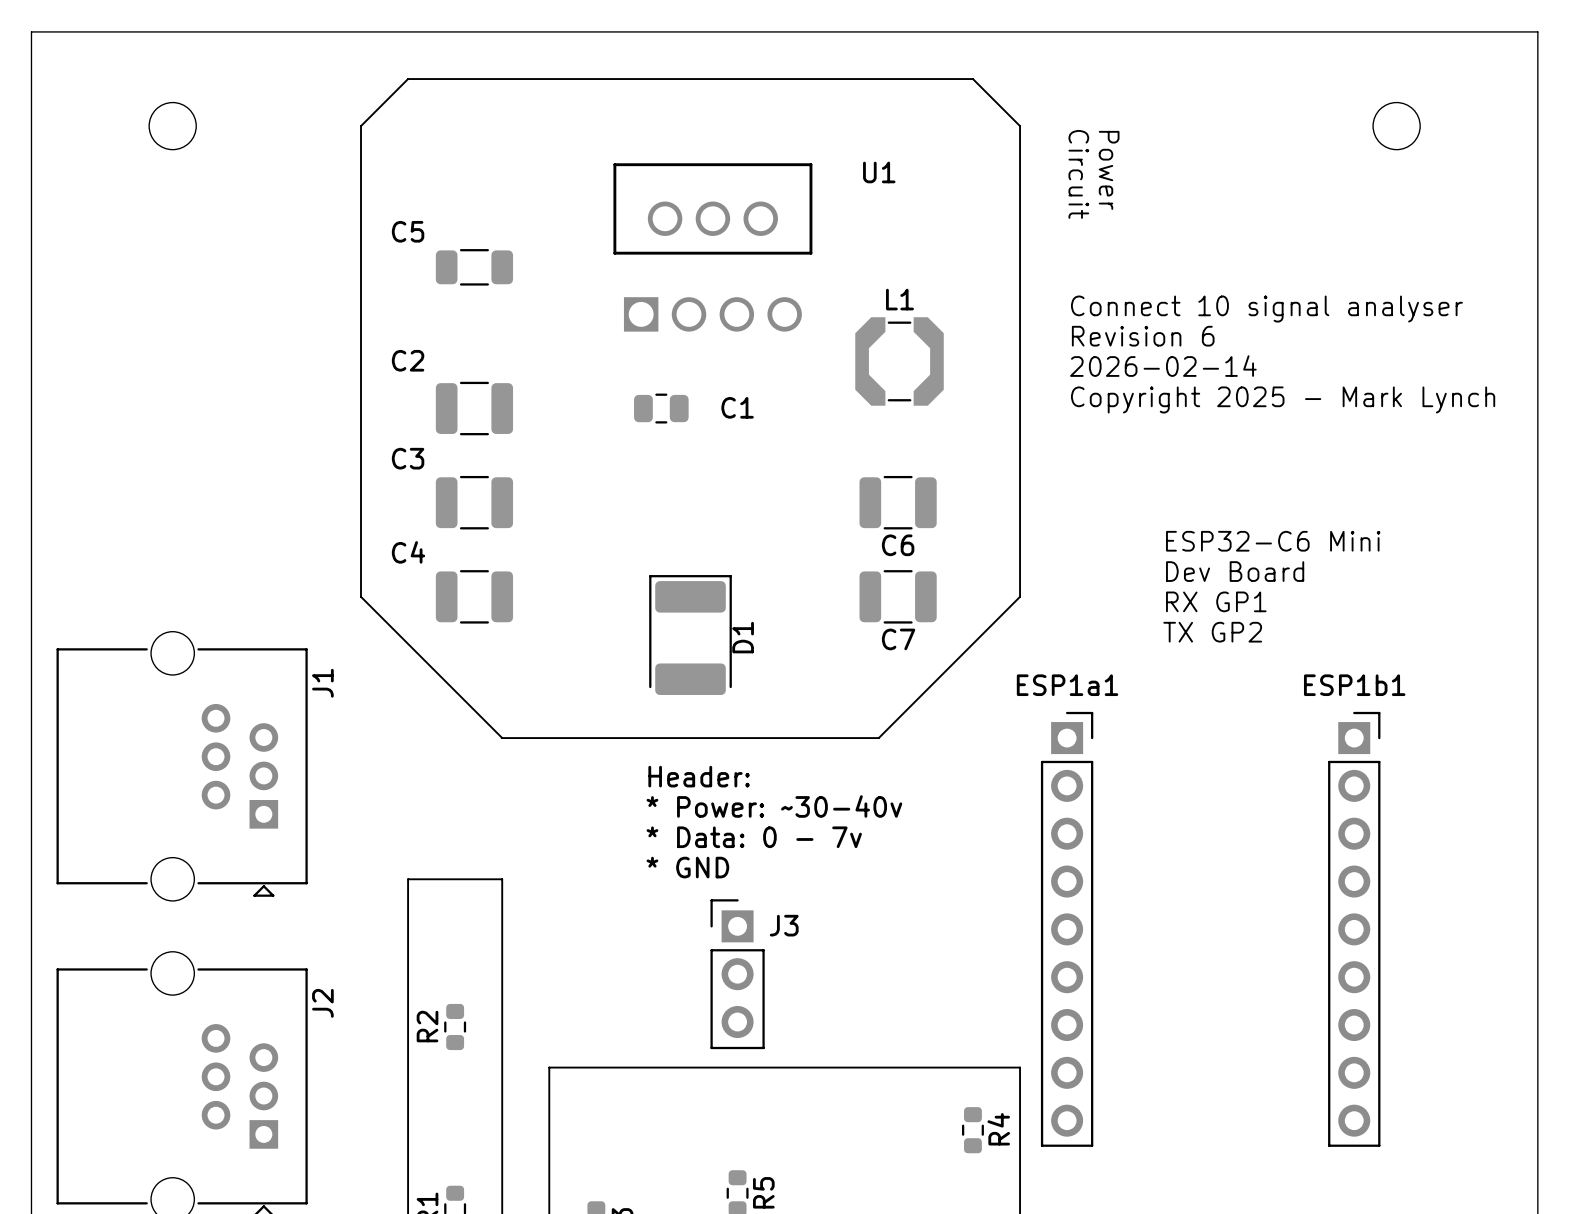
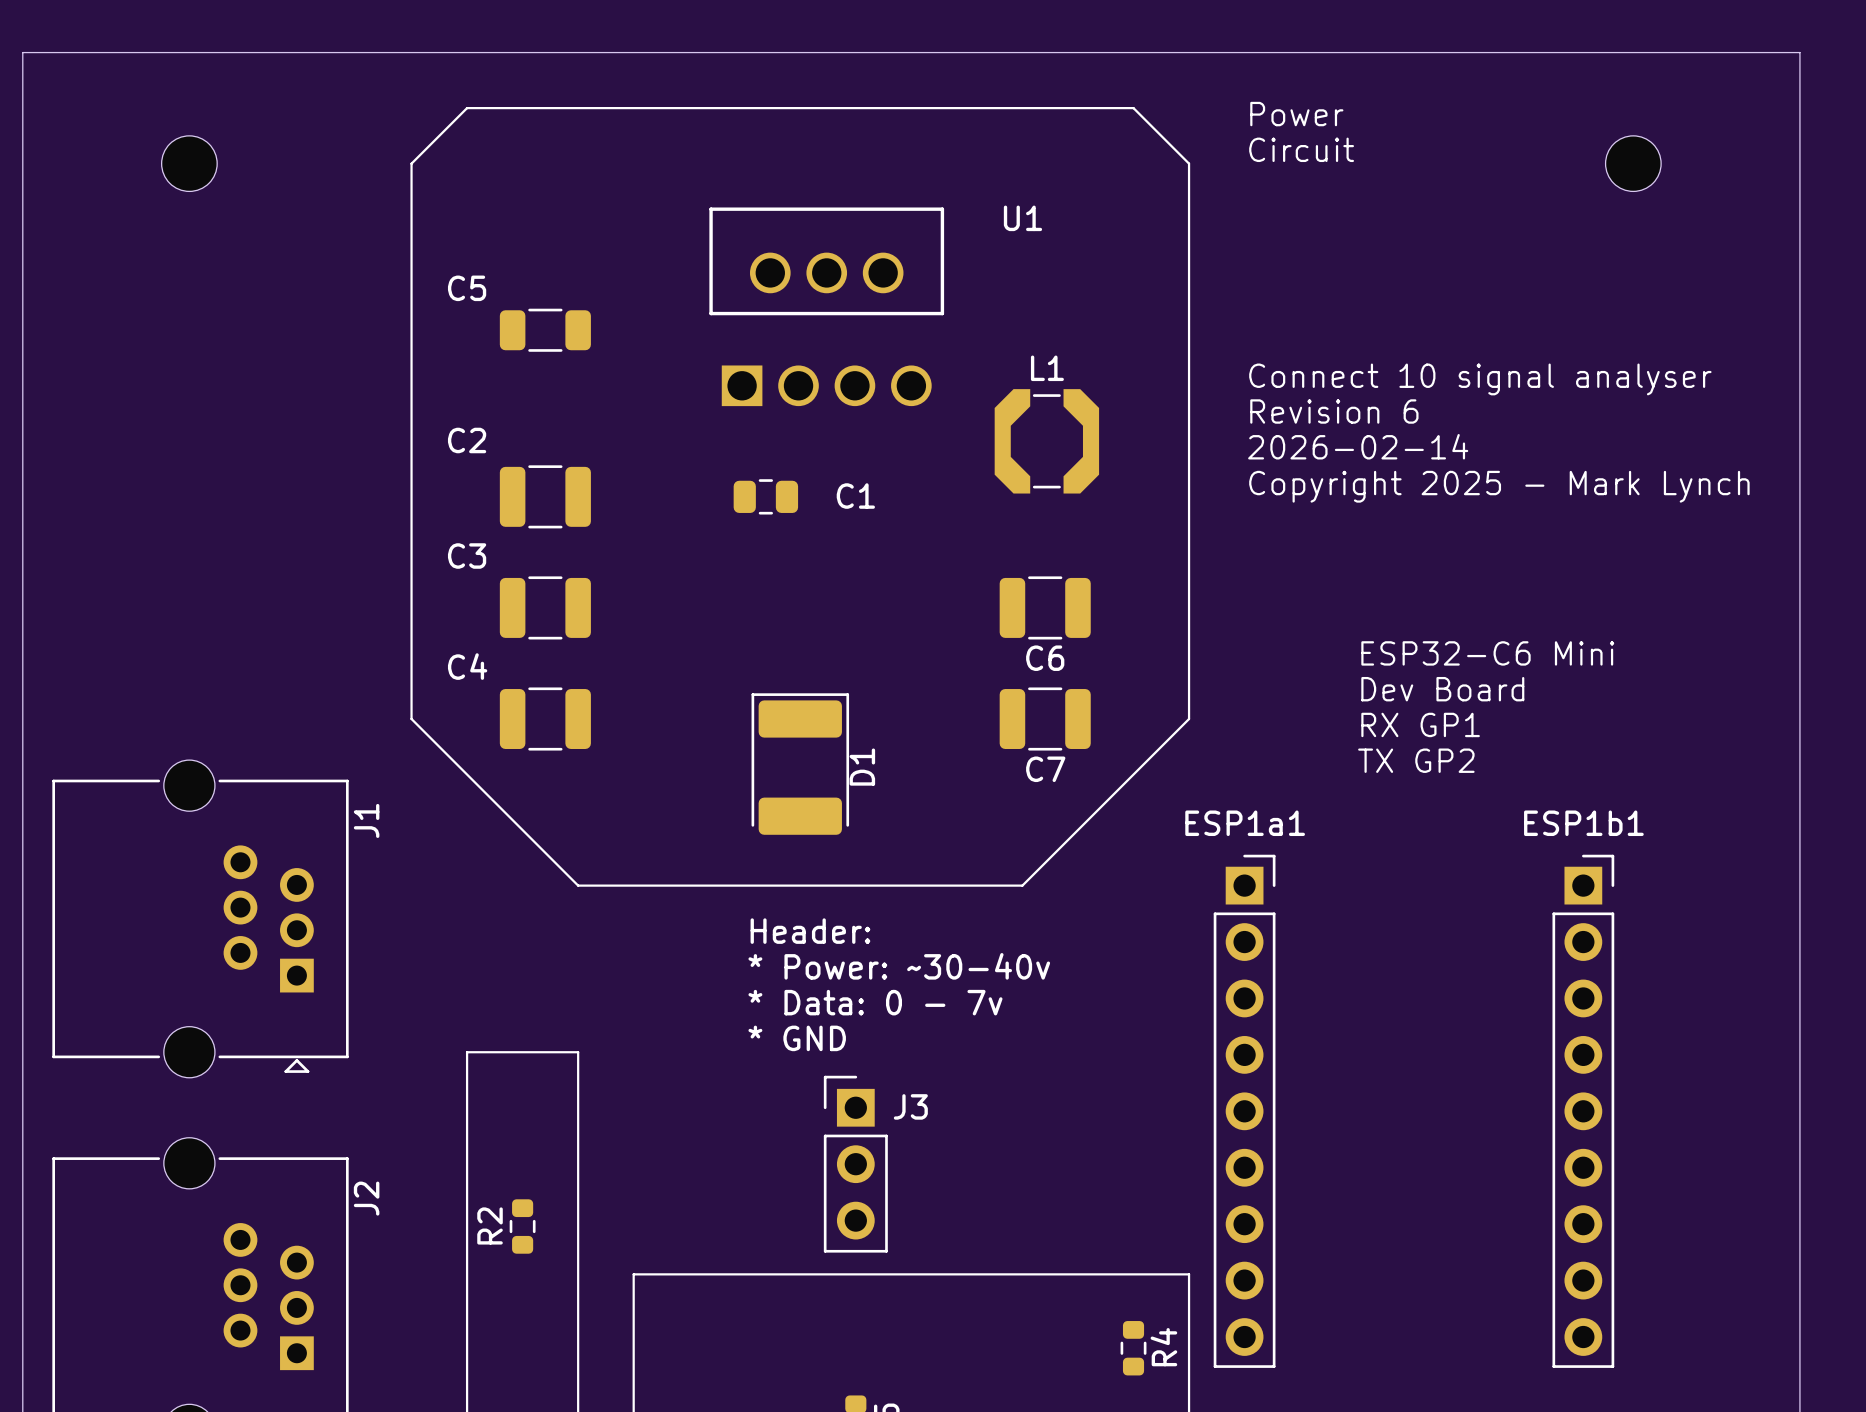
text rotation: 0° (1109, 170) -> 90° counterclockwise (1296, 114)
text rotation: 0° (1078, 174) -> 90° counterclockwise (1301, 149)

